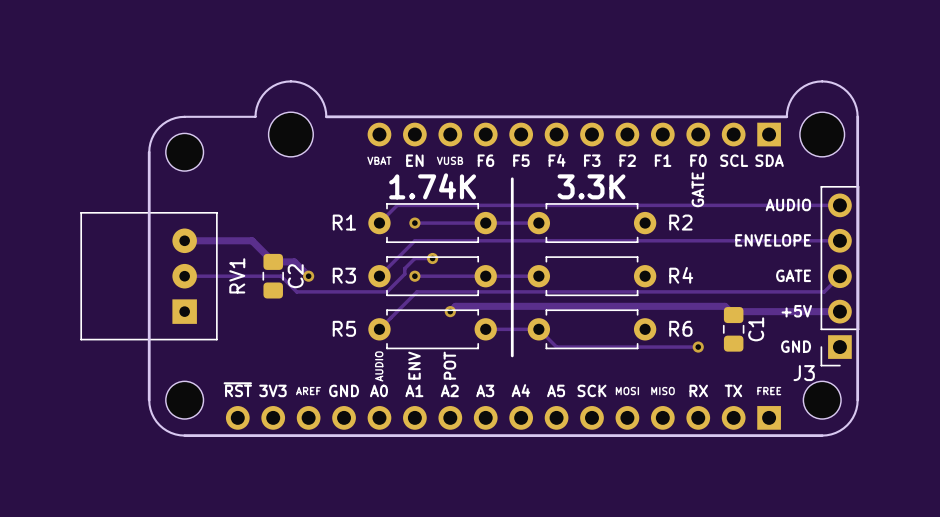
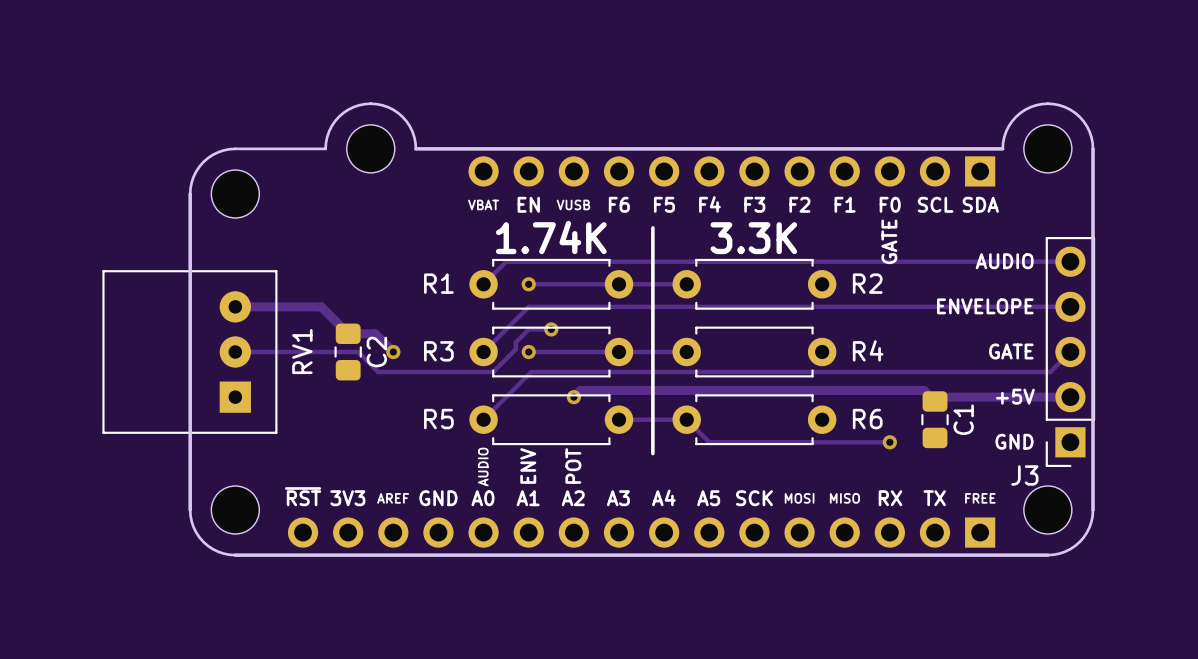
part: none -> (370, 148)
part: none -> (1047, 148)
part: (290, 134) -> none
part: (822, 134) -> none

